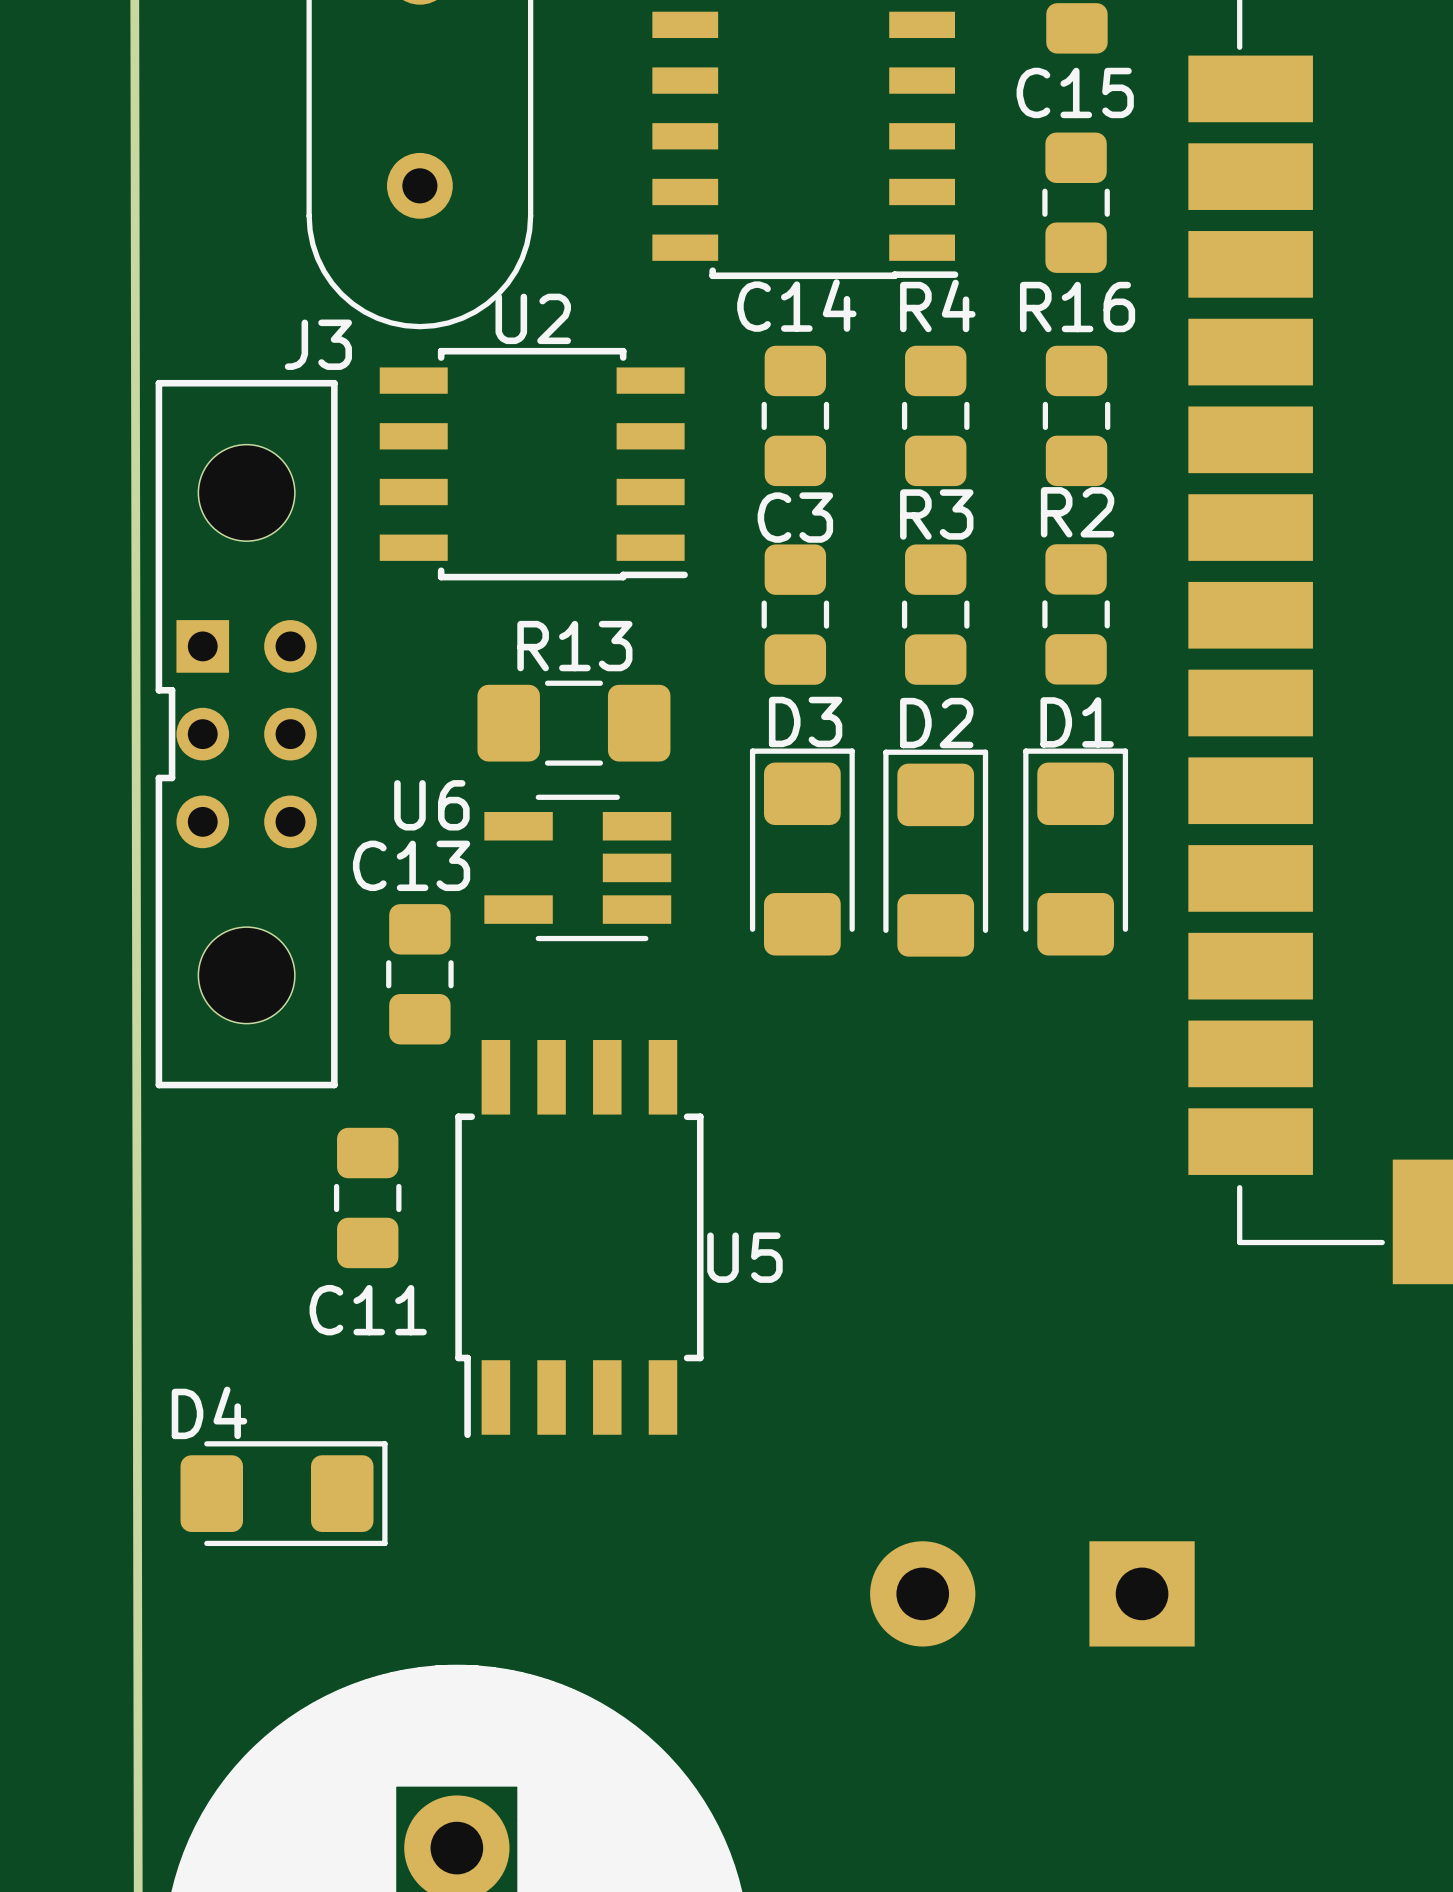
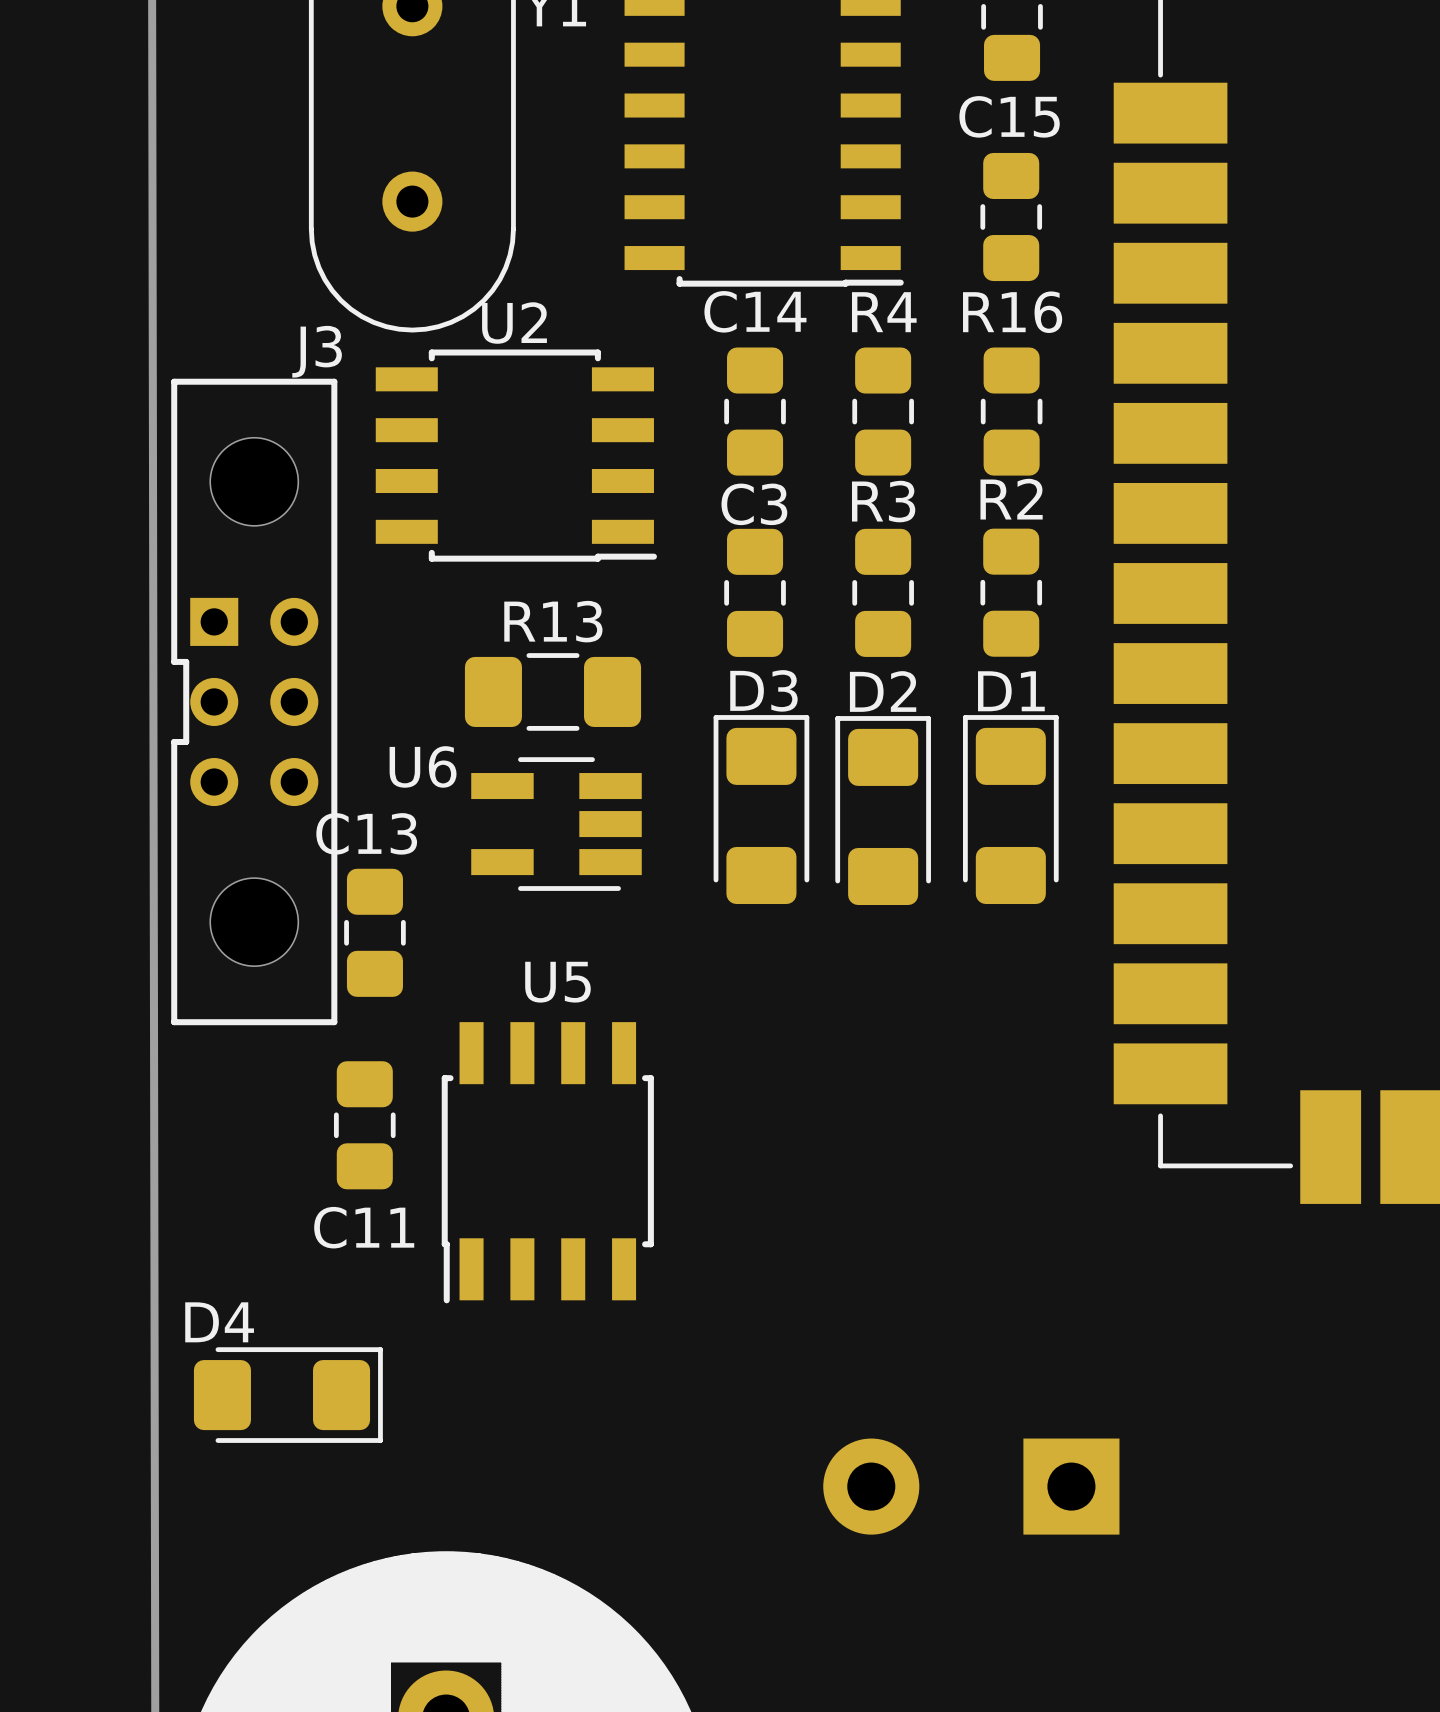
C13 position: (419, 974) -> (374, 932)
U5 footprint: [455, 1039, 704, 1439] -> [441, 1022, 654, 1304]
U5 name position: U5 (744, 1257) -> U5 (557, 982)

